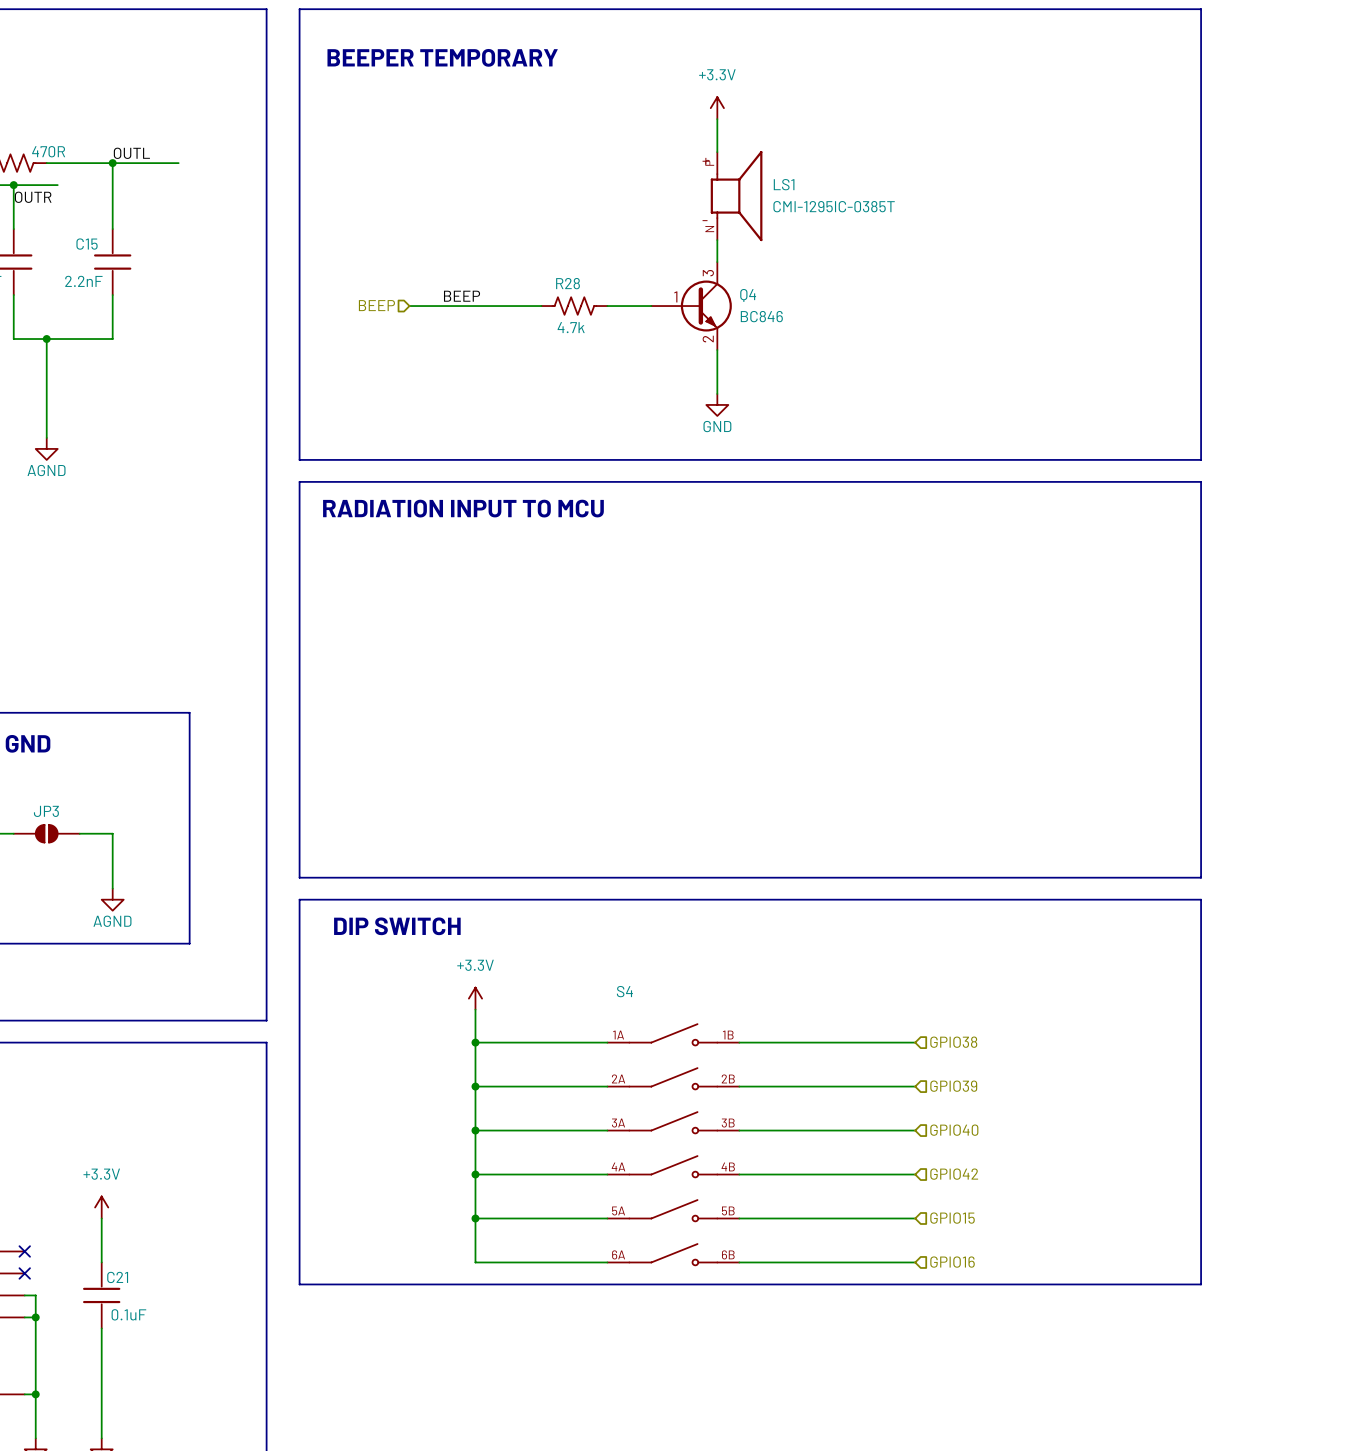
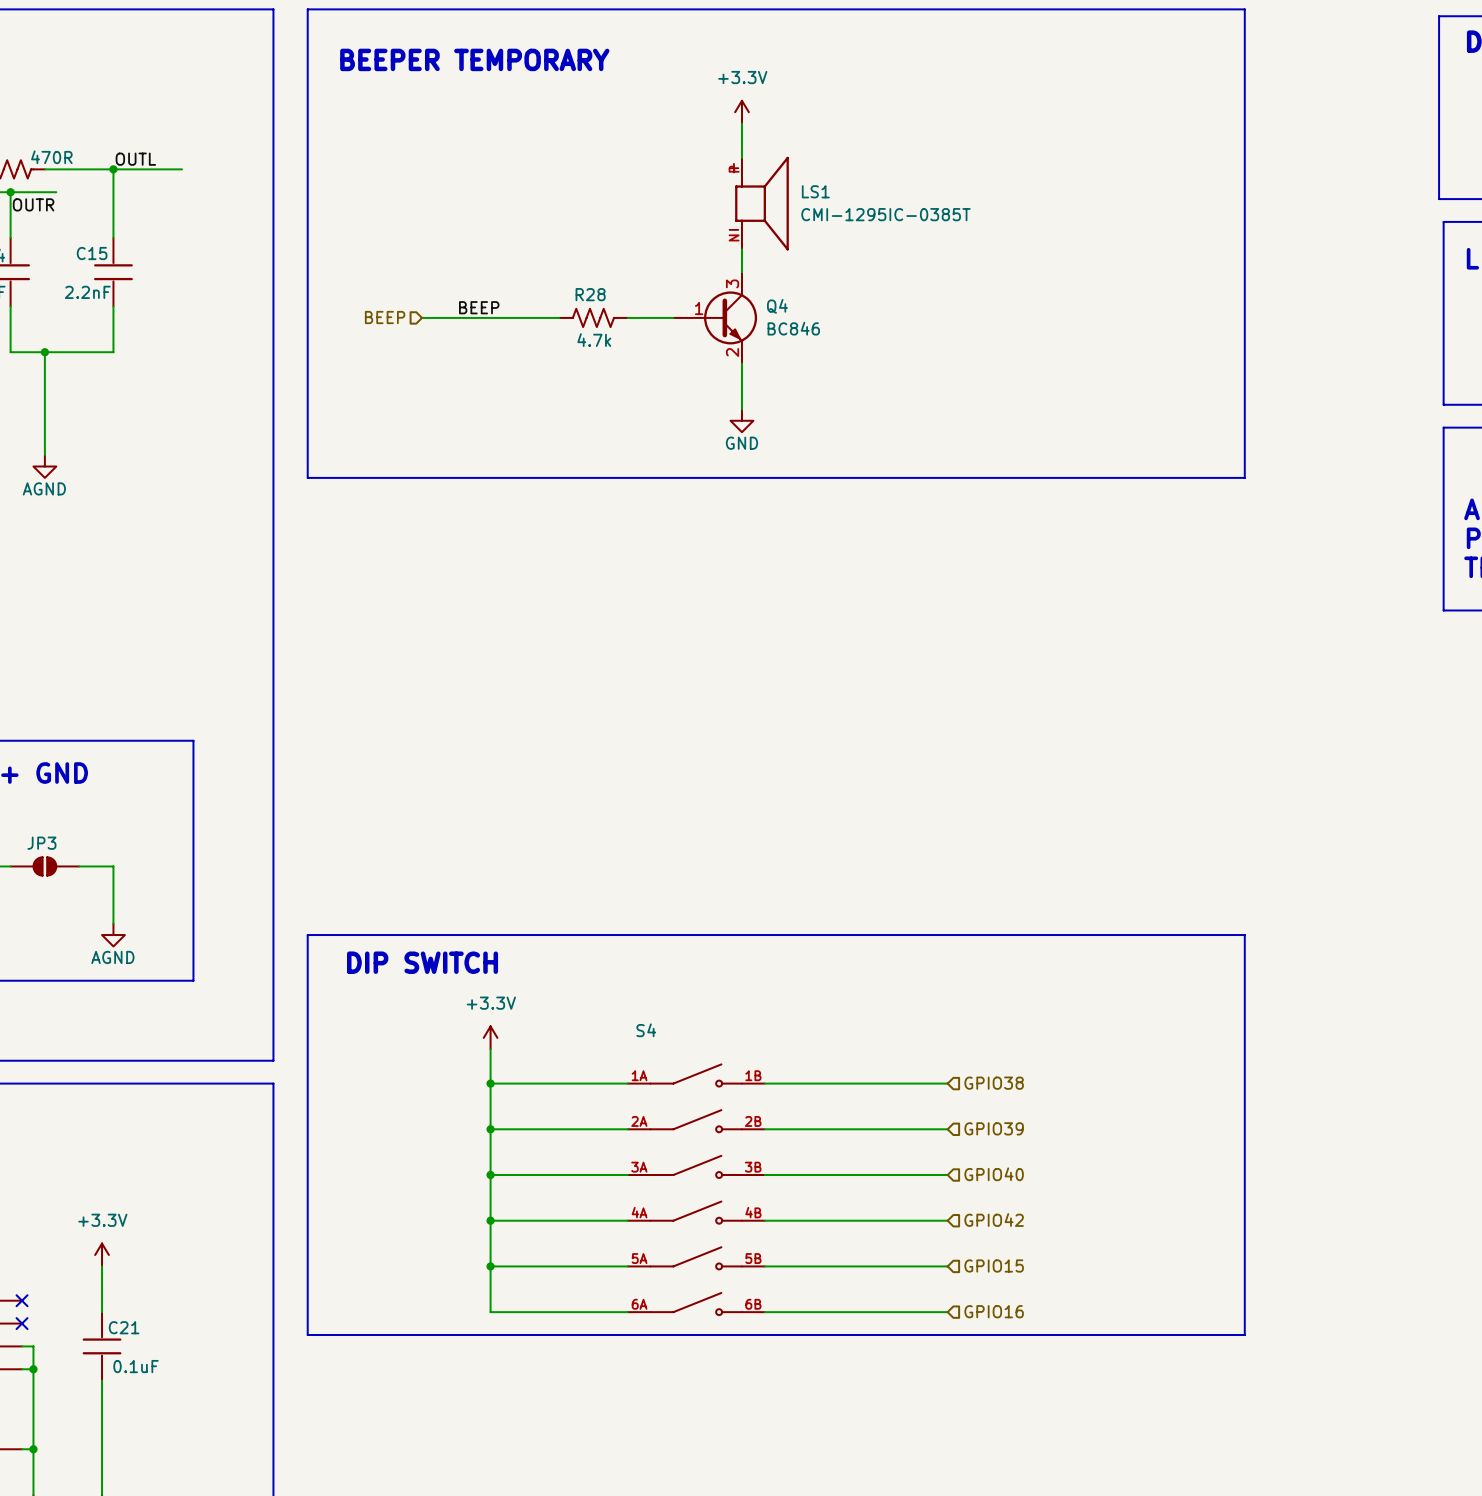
line: (299, 481) (1201, 481) (1201, 877) (299, 877) (299, 481) -> none
text: RADIATION INPUT TO MCU (463, 508) -> none

